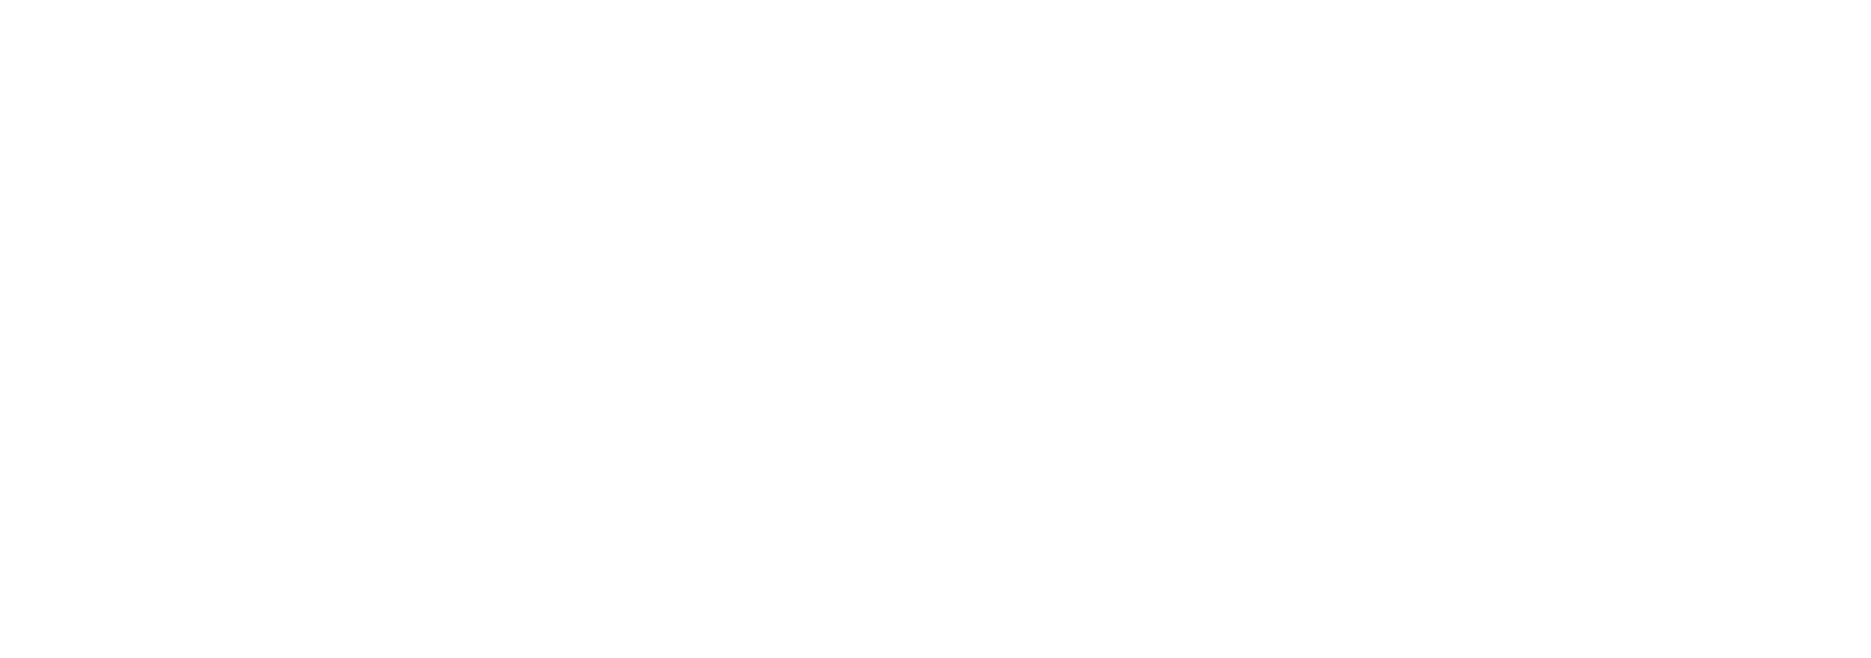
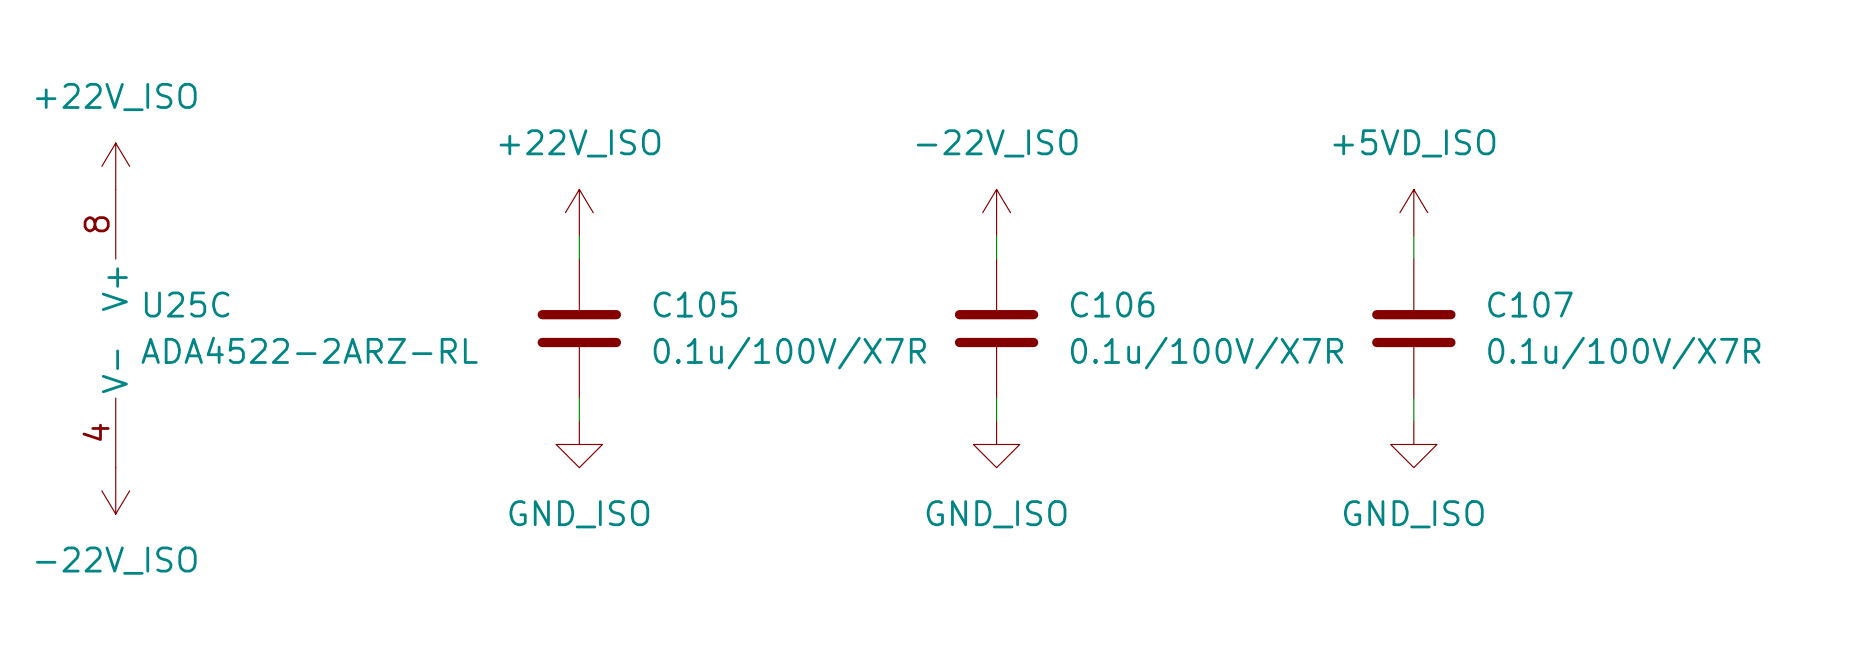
power symbol: none -> +22V_ISO (115, 166)
power symbol: none -> +22V_ISO (579, 212)
power symbol: none -> -22V_ISO (996, 212)
power symbol: none -> +5VD_ISO (1413, 212)
wire: none -> (579, 235) (579, 259)
wire: none -> (996, 235) (996, 259)
wire: none -> (1413, 235) (1413, 259)
U25C: none -> ADA4522-2ARZ-RL (115, 328)
C105: none -> 0.1u/100V/X7R (579, 328)
C106: none -> 0.1u/100V/X7R (996, 328)
C107: none -> 0.1u/100V/X7R (1413, 328)
wire: none -> (579, 398) (579, 421)
wire: none -> (996, 398) (996, 421)
wire: none -> (1413, 398) (1413, 421)
power symbol: none -> GND_ISO (579, 444)
power symbol: none -> GND_ISO (996, 444)
power symbol: none -> GND_ISO (1413, 444)
power symbol: none -> -22V_ISO (115, 490)

